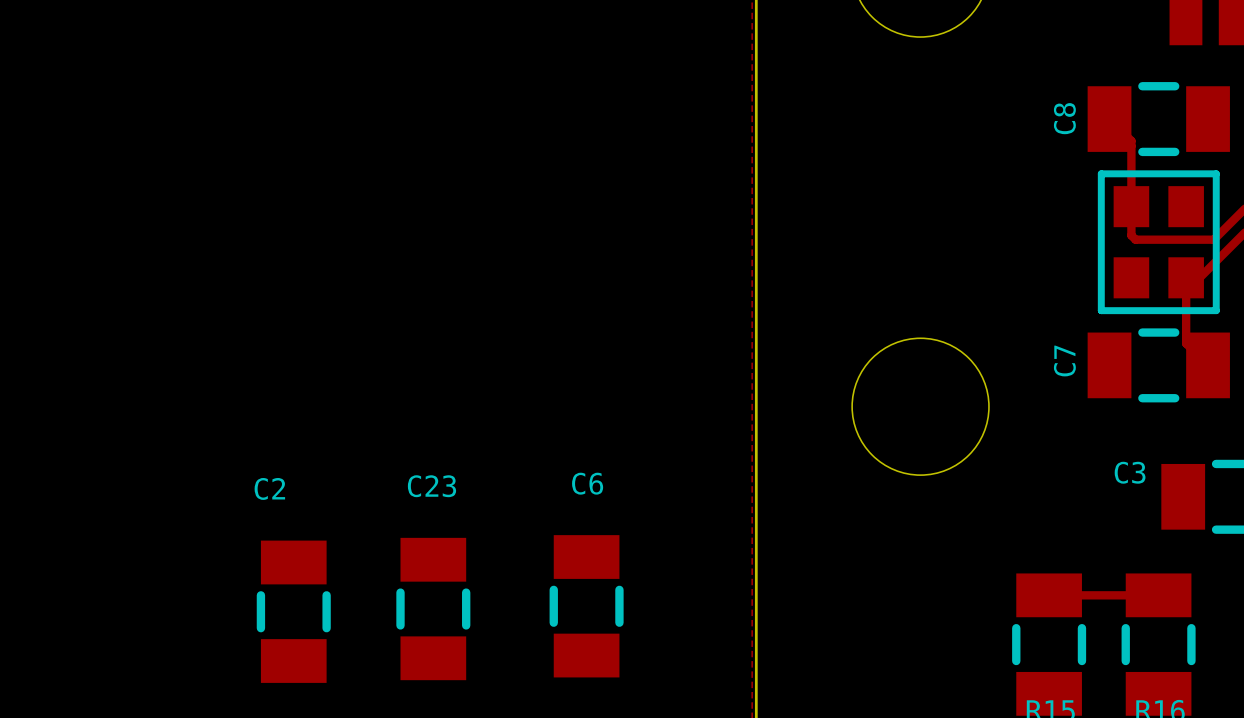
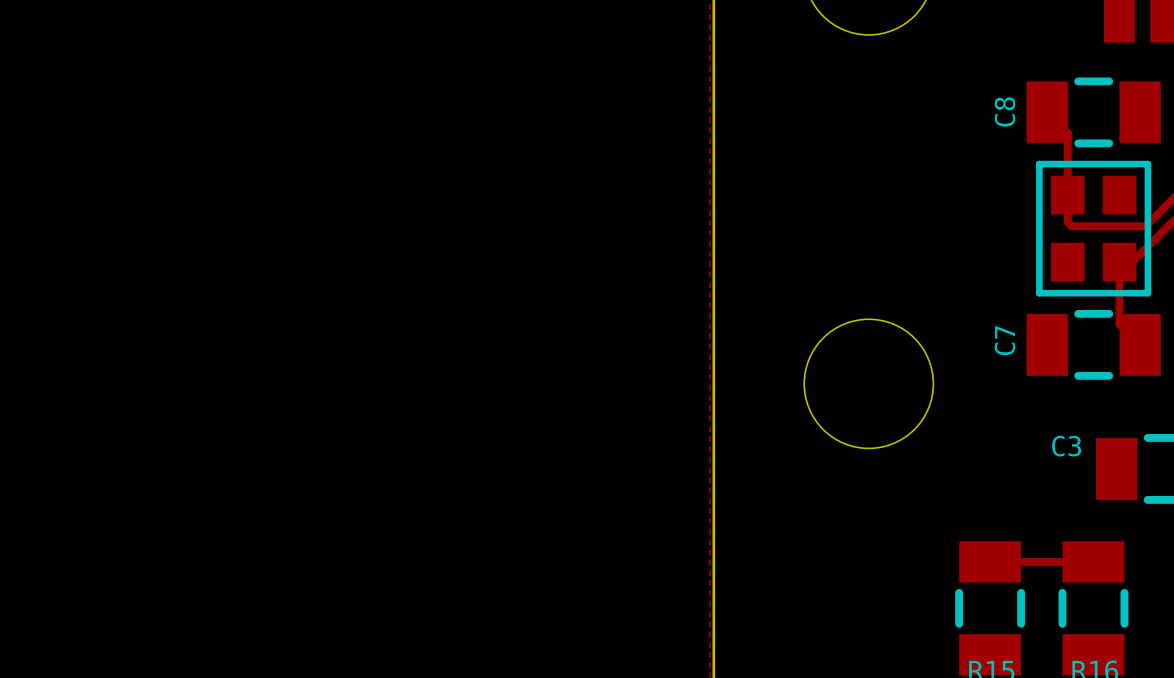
C6: (586, 606) -> none
C23: (433, 609) -> none
C2: (293, 611) -> none

